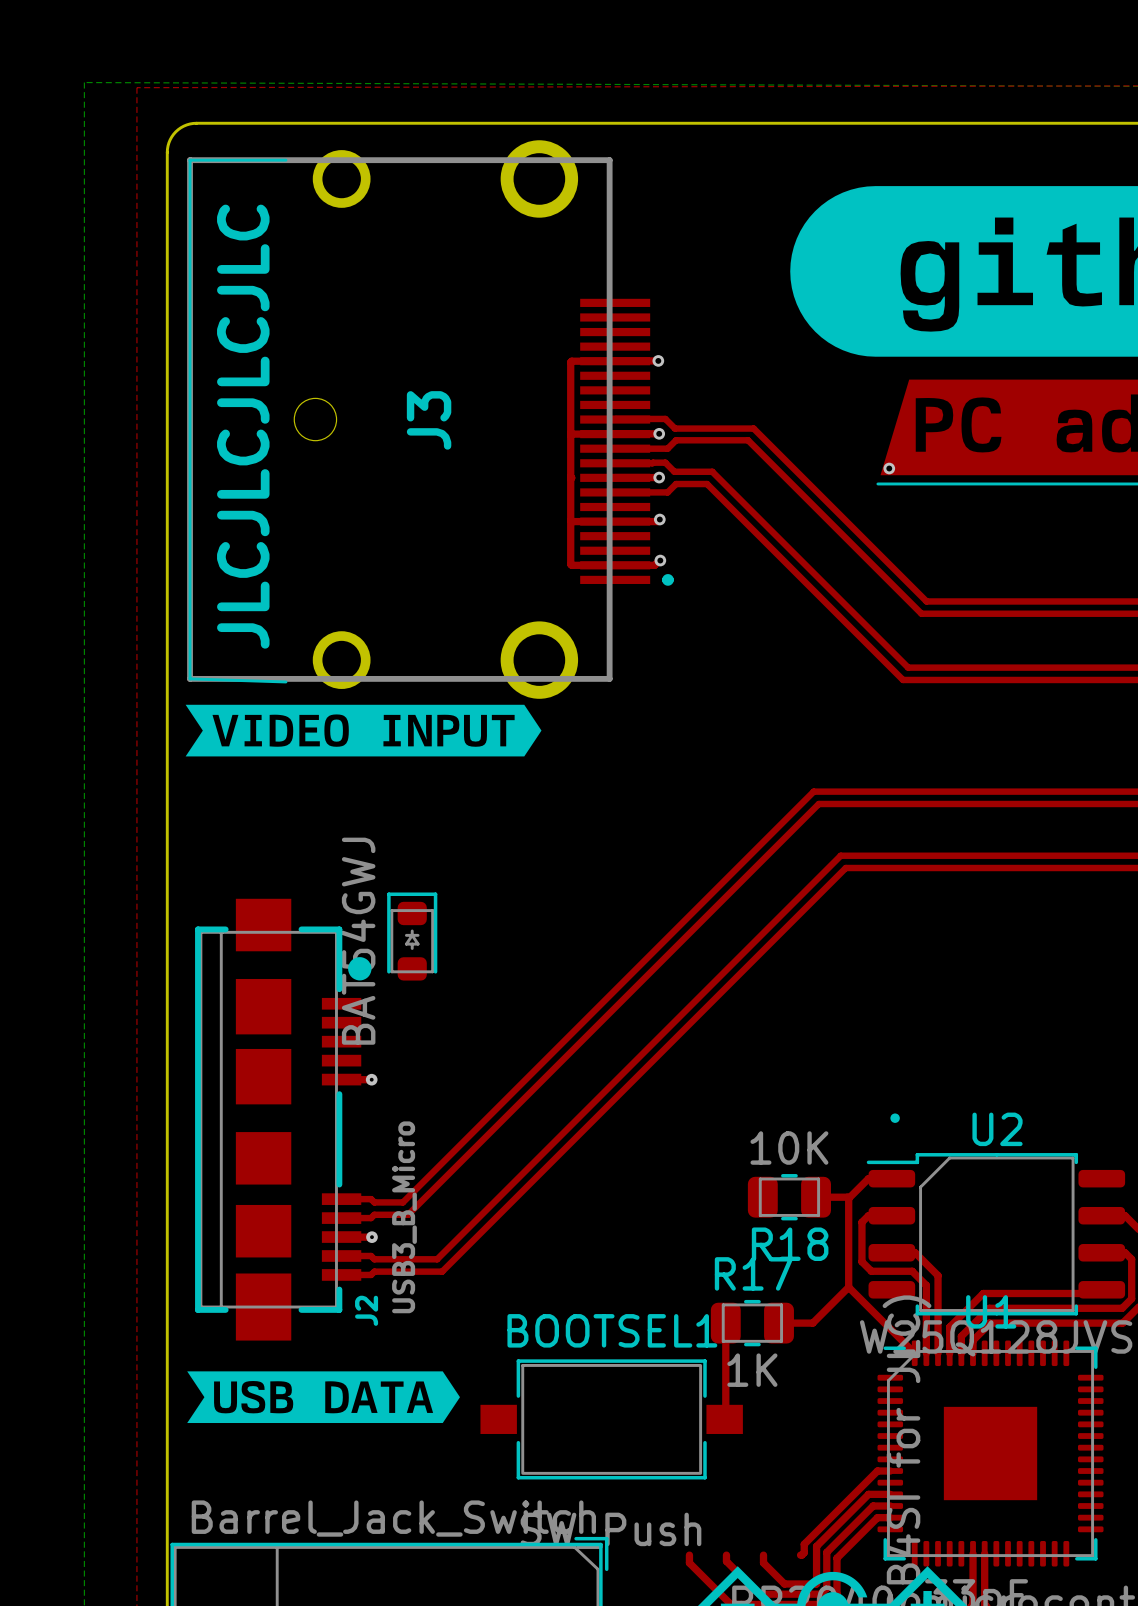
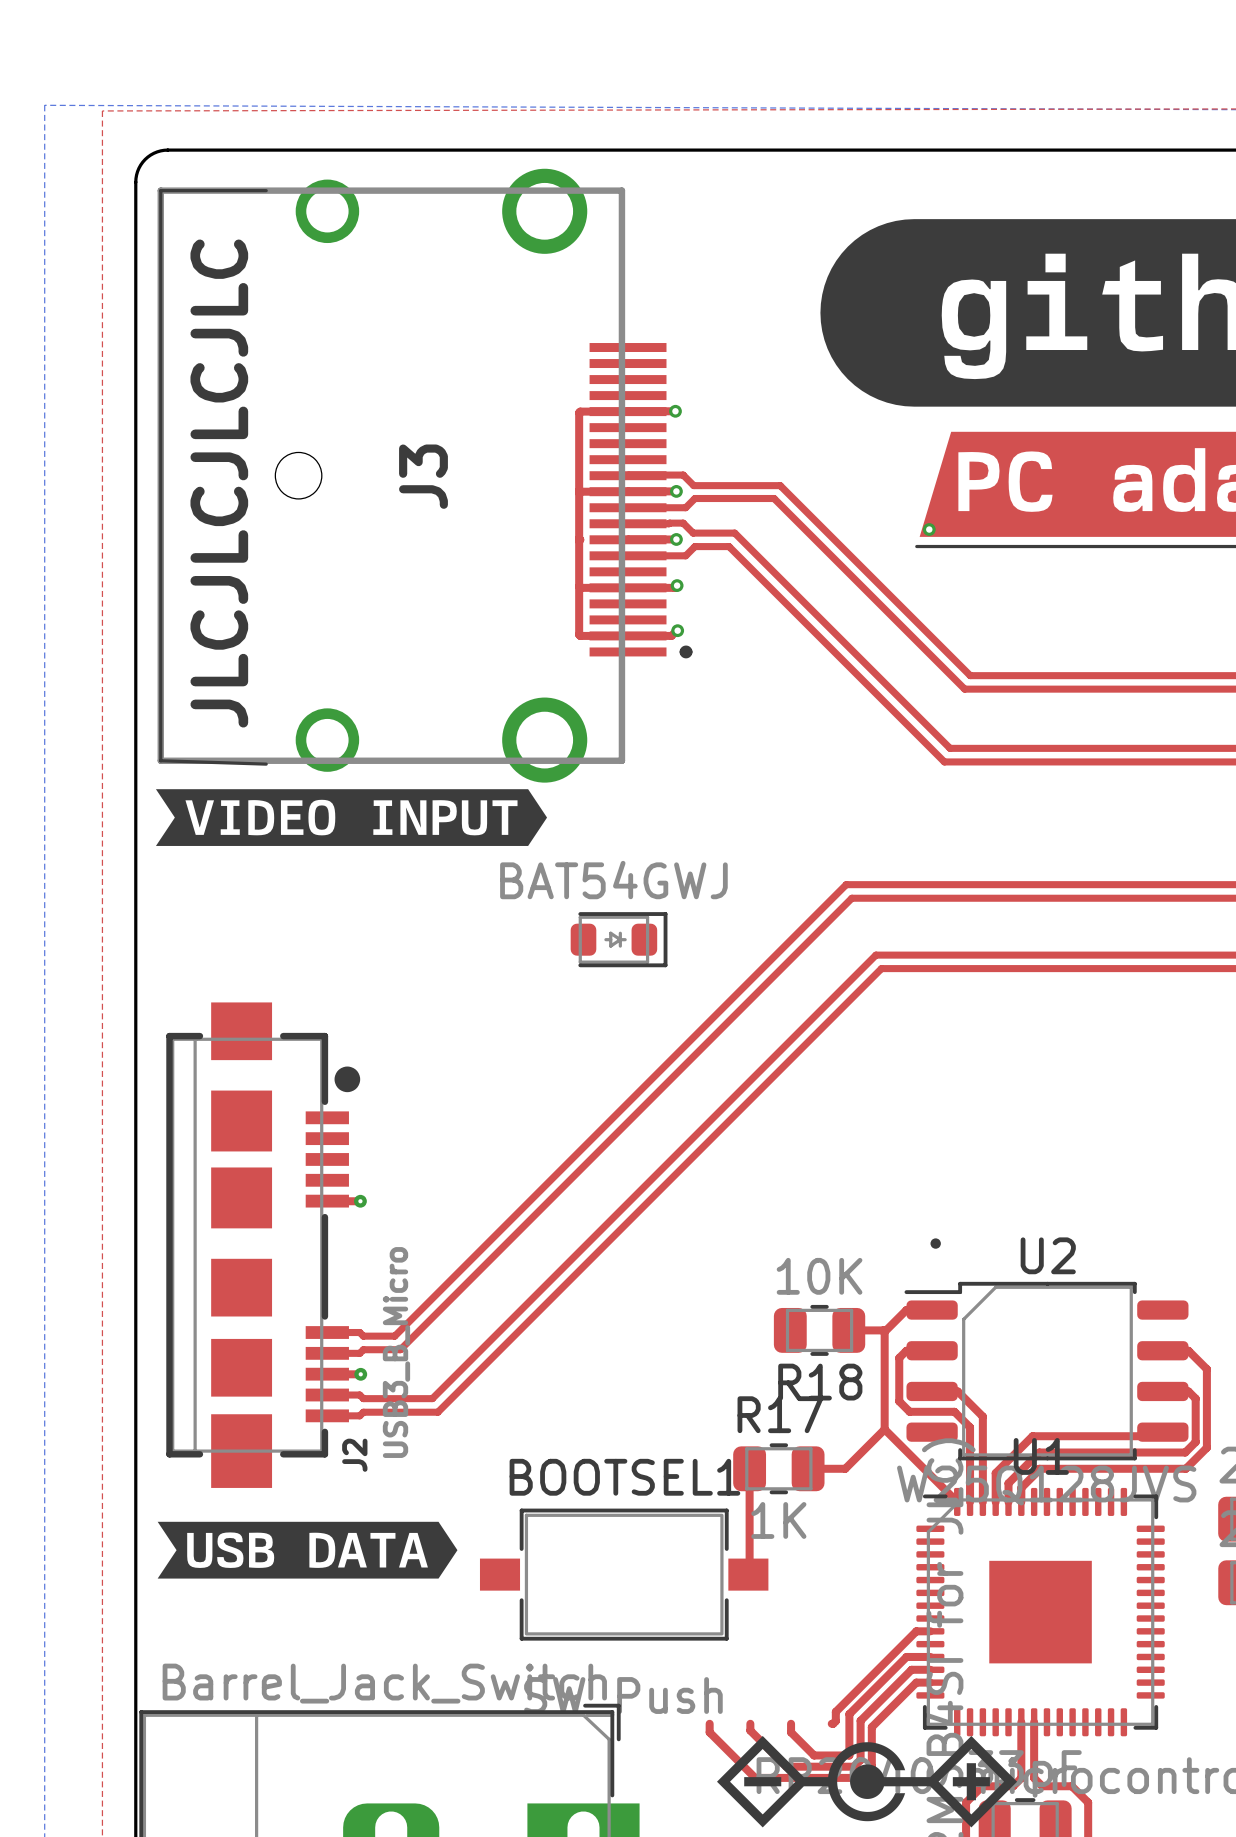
part rotation: 0° (412, 936) -> 90° clockwise (619, 939)
part position: (412, 936) -> (619, 939)

